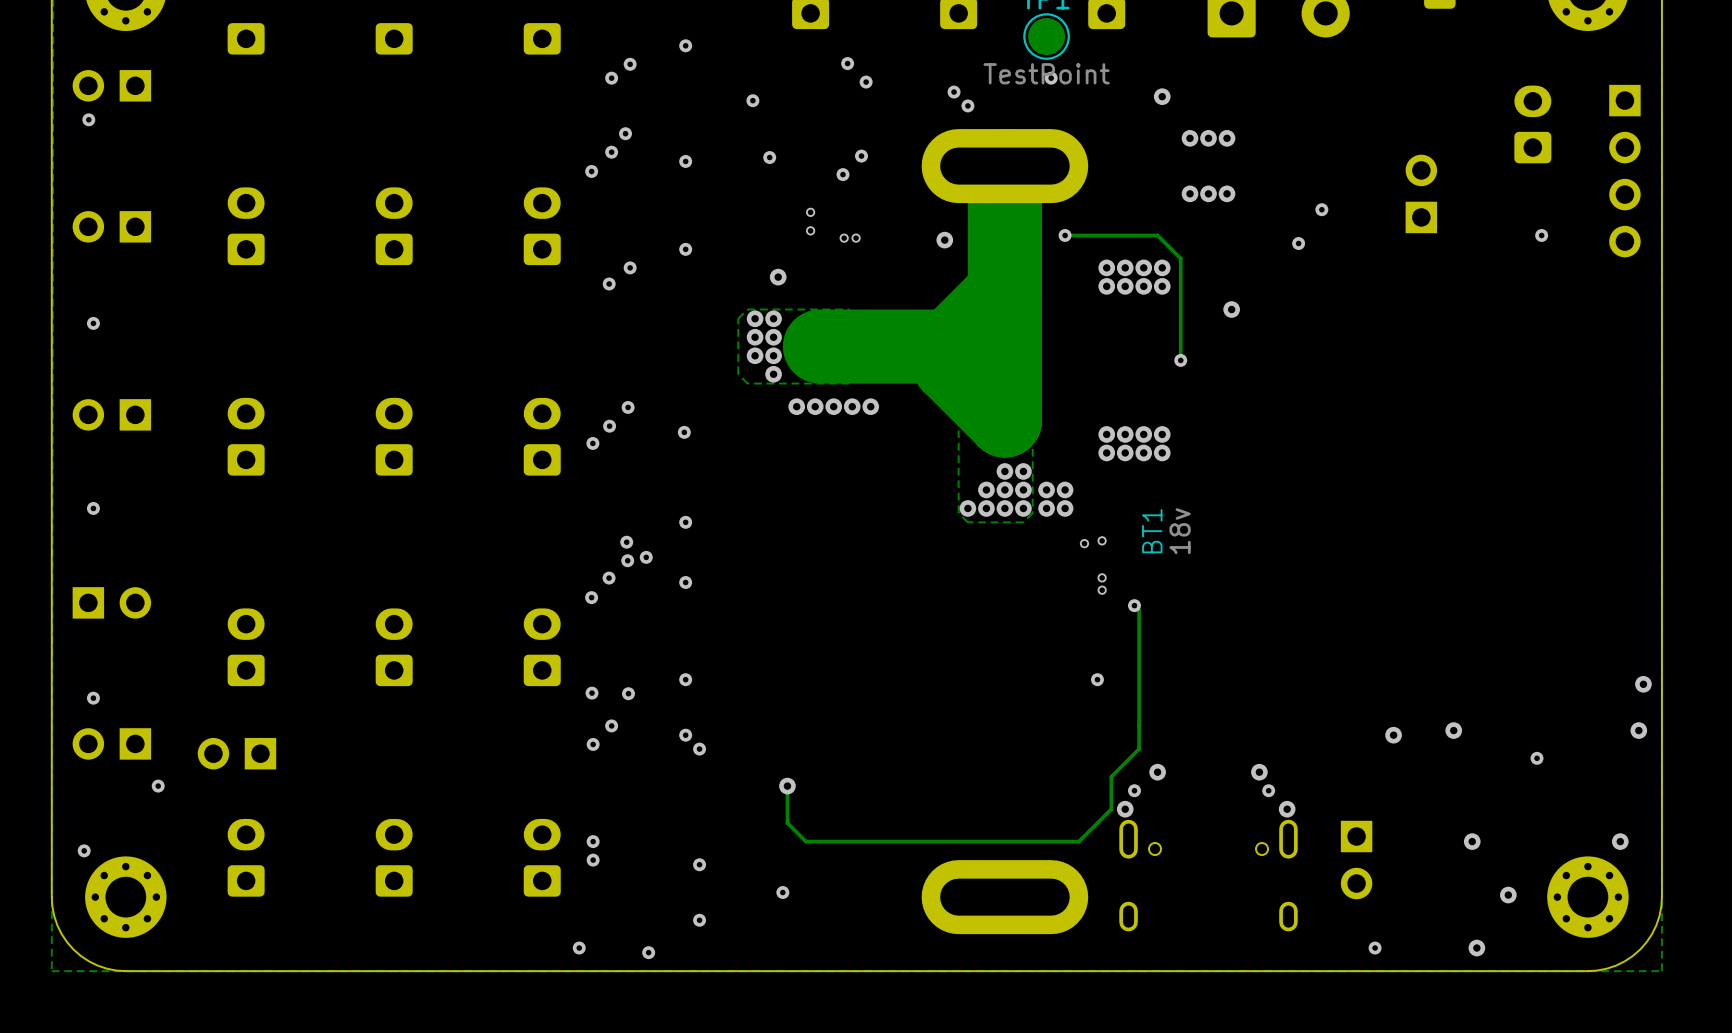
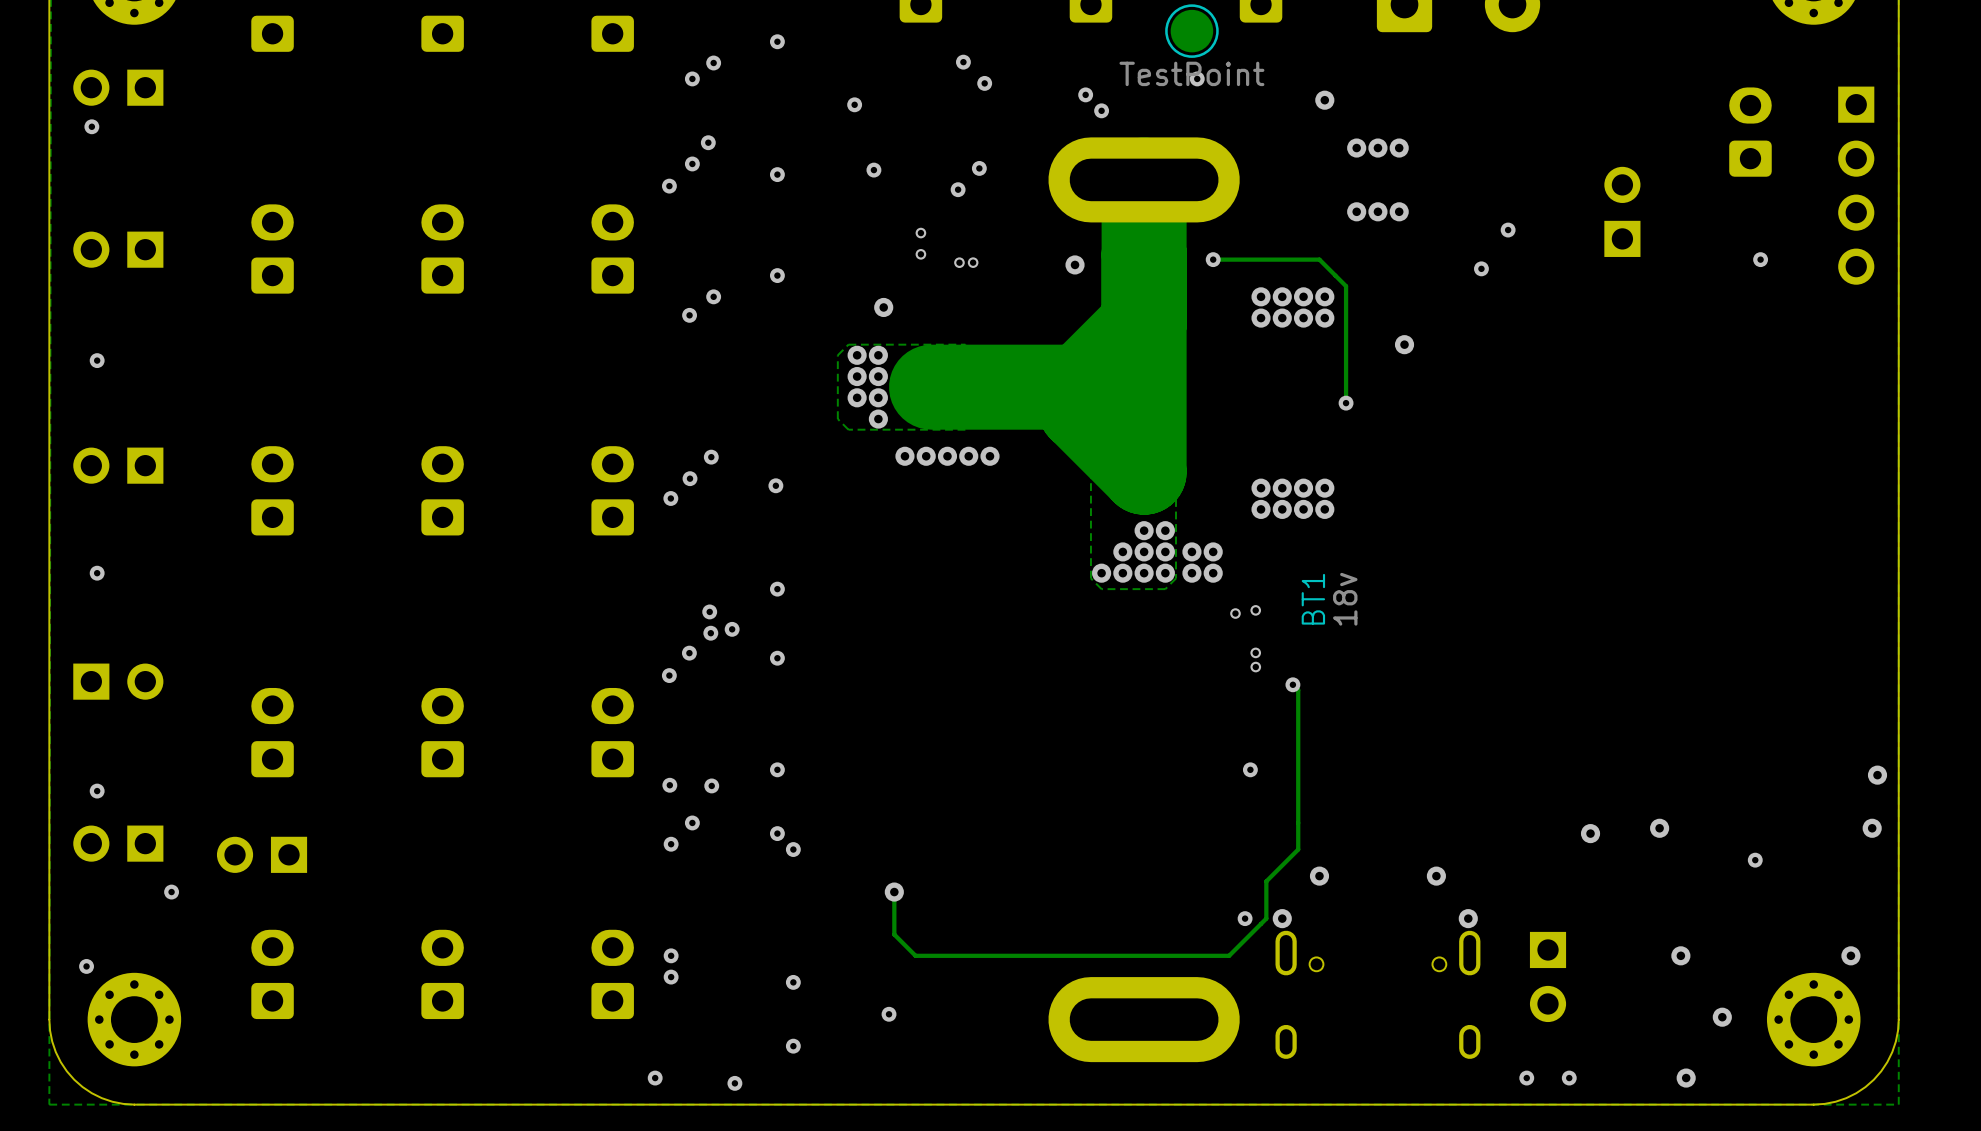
via position: (1134, 790) -> (1245, 918)
via: (1268, 790) -> none
via: none -> (1526, 1078)

